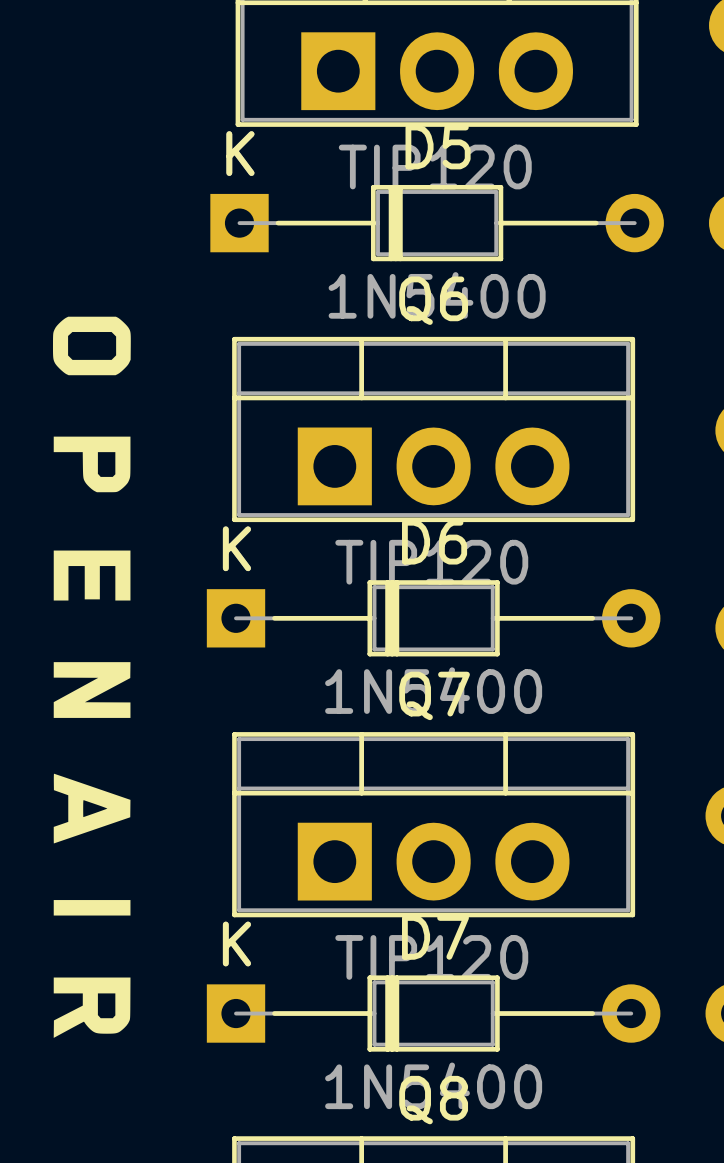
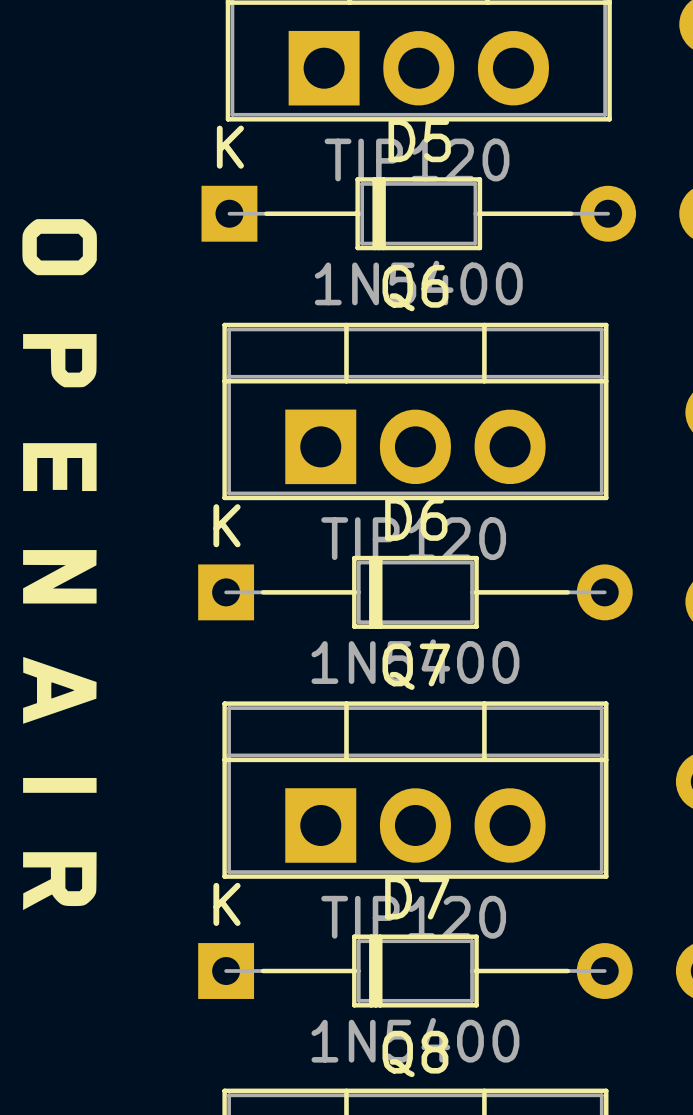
drawing position: (91, 677) -> (59, 564)

